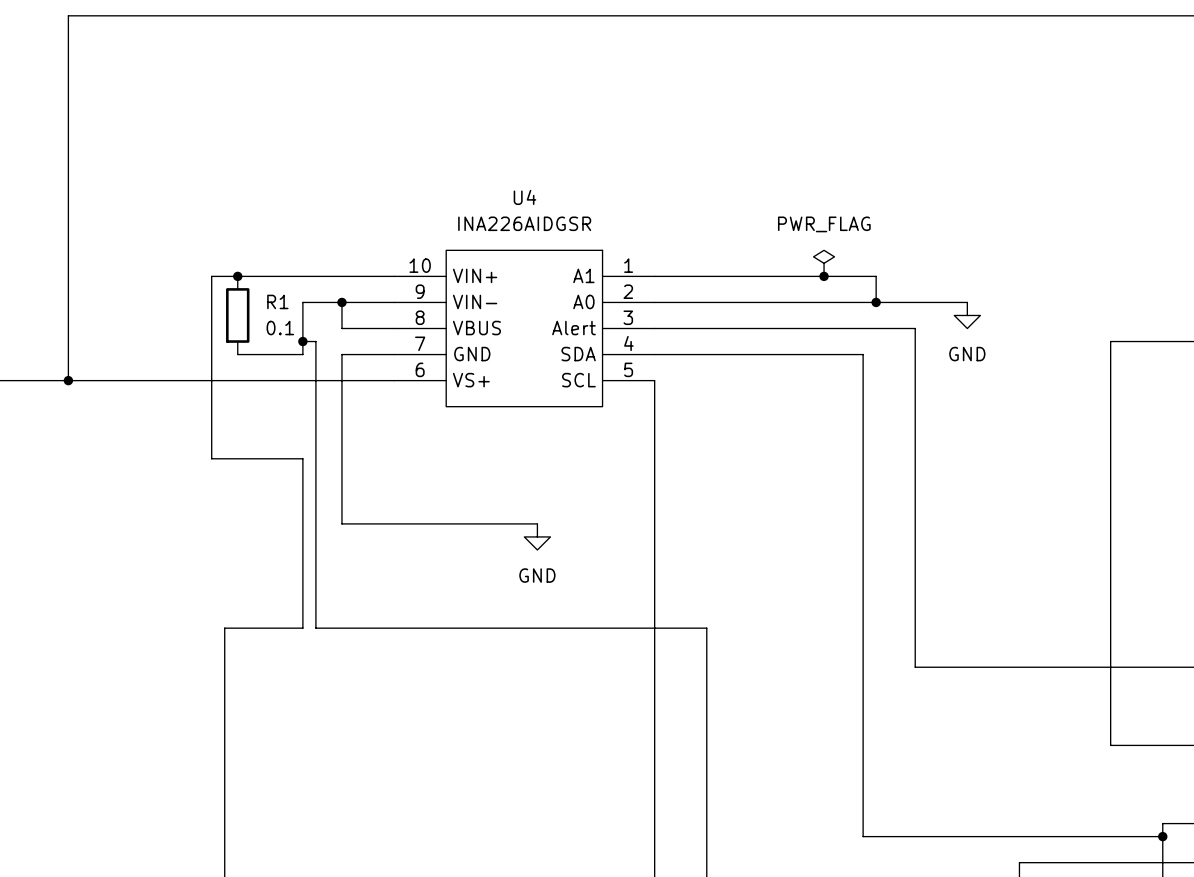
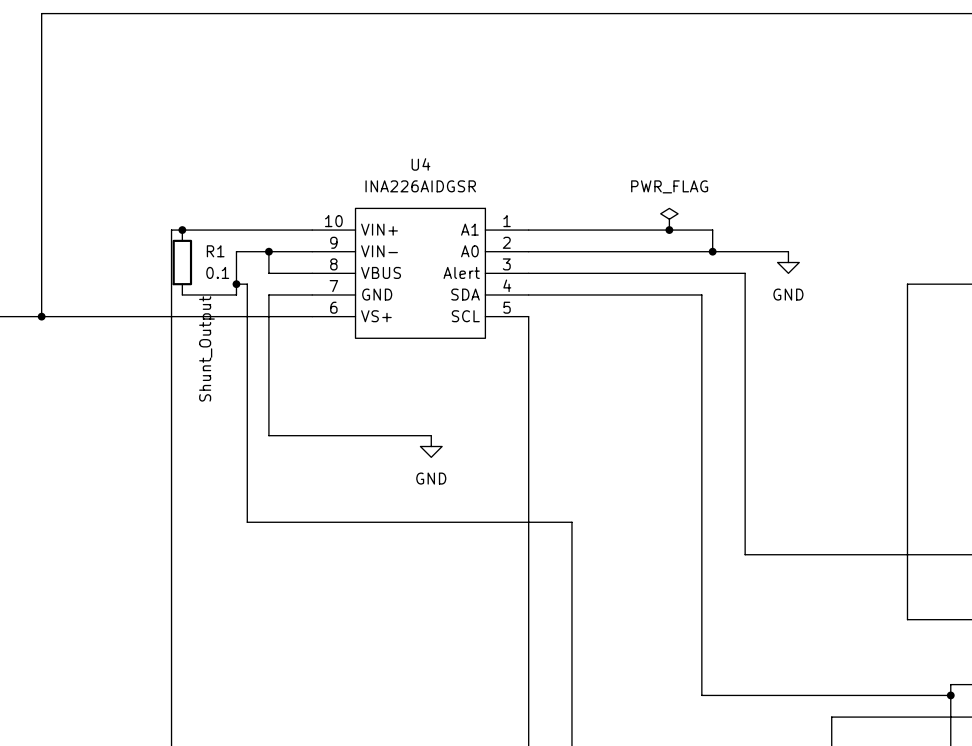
wire: (224, 276) (211, 276) (211, 458) (302, 458) (302, 628) (224, 628) -> (171, 230) (171, 522)
label: none -> Shunt_Output (206, 348)

